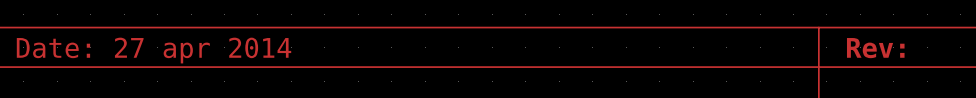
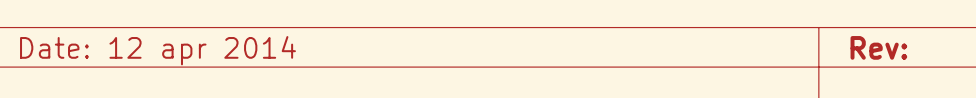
title block: Date: 27 apr 2014 (154, 50) -> Date: 12 apr 2014 (157, 50)

